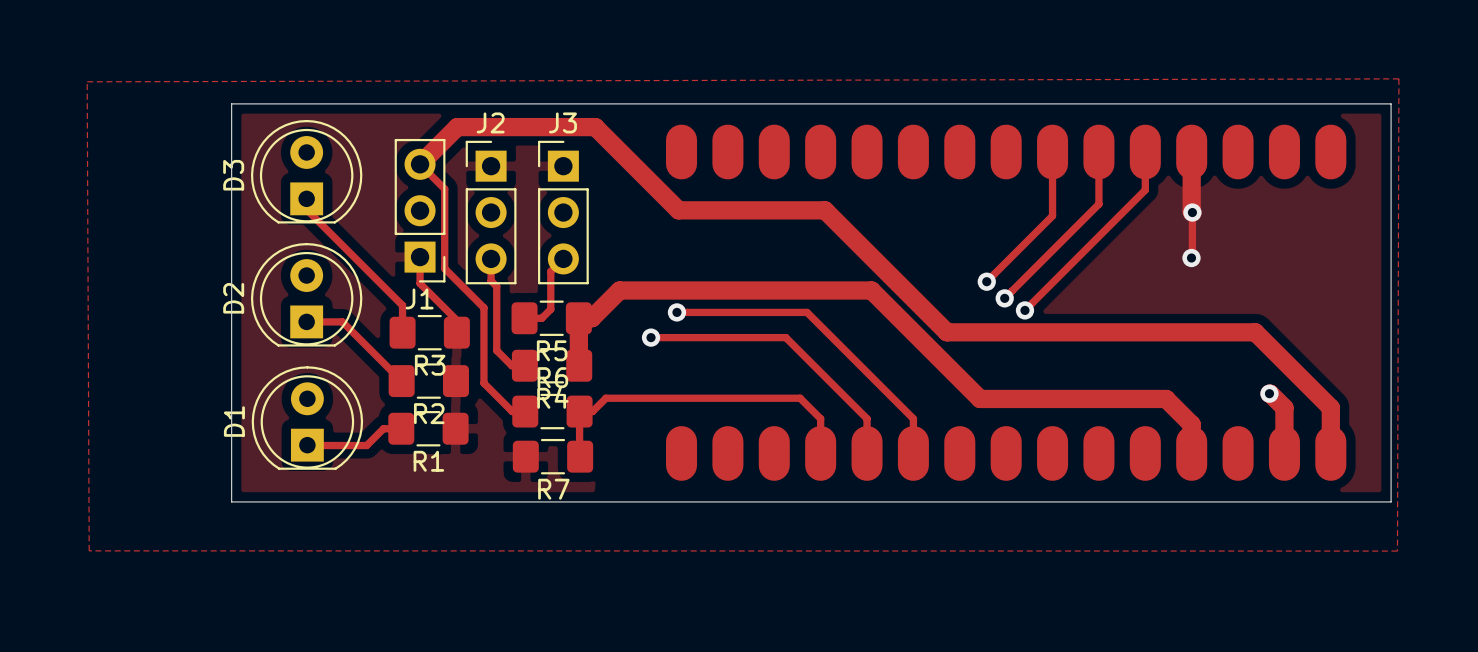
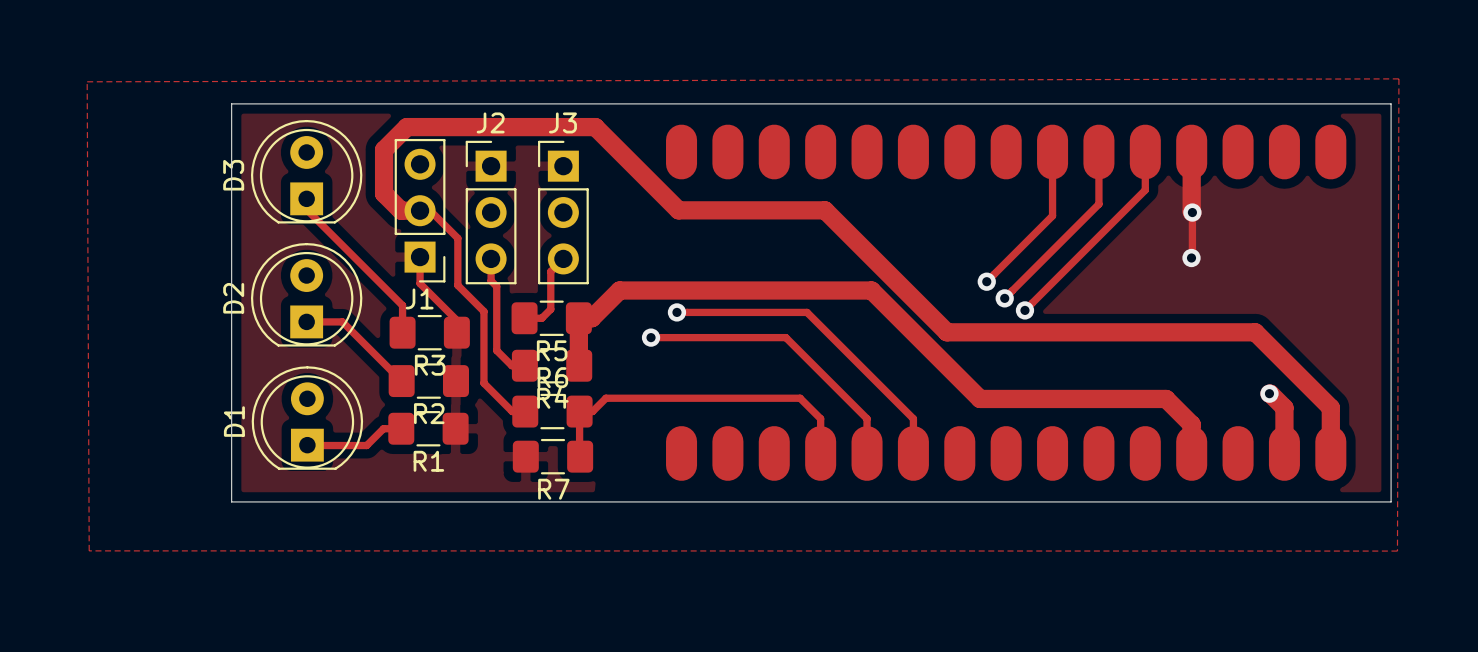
track: (457, 127) (420, 164) (444, 188) (444, 268) (483, 307) (483, 311) -> (457, 127) (406, 127) (384, 149) (384, 193) (401, 210) (430, 210) (457, 238) (457, 285) (483, 311)

